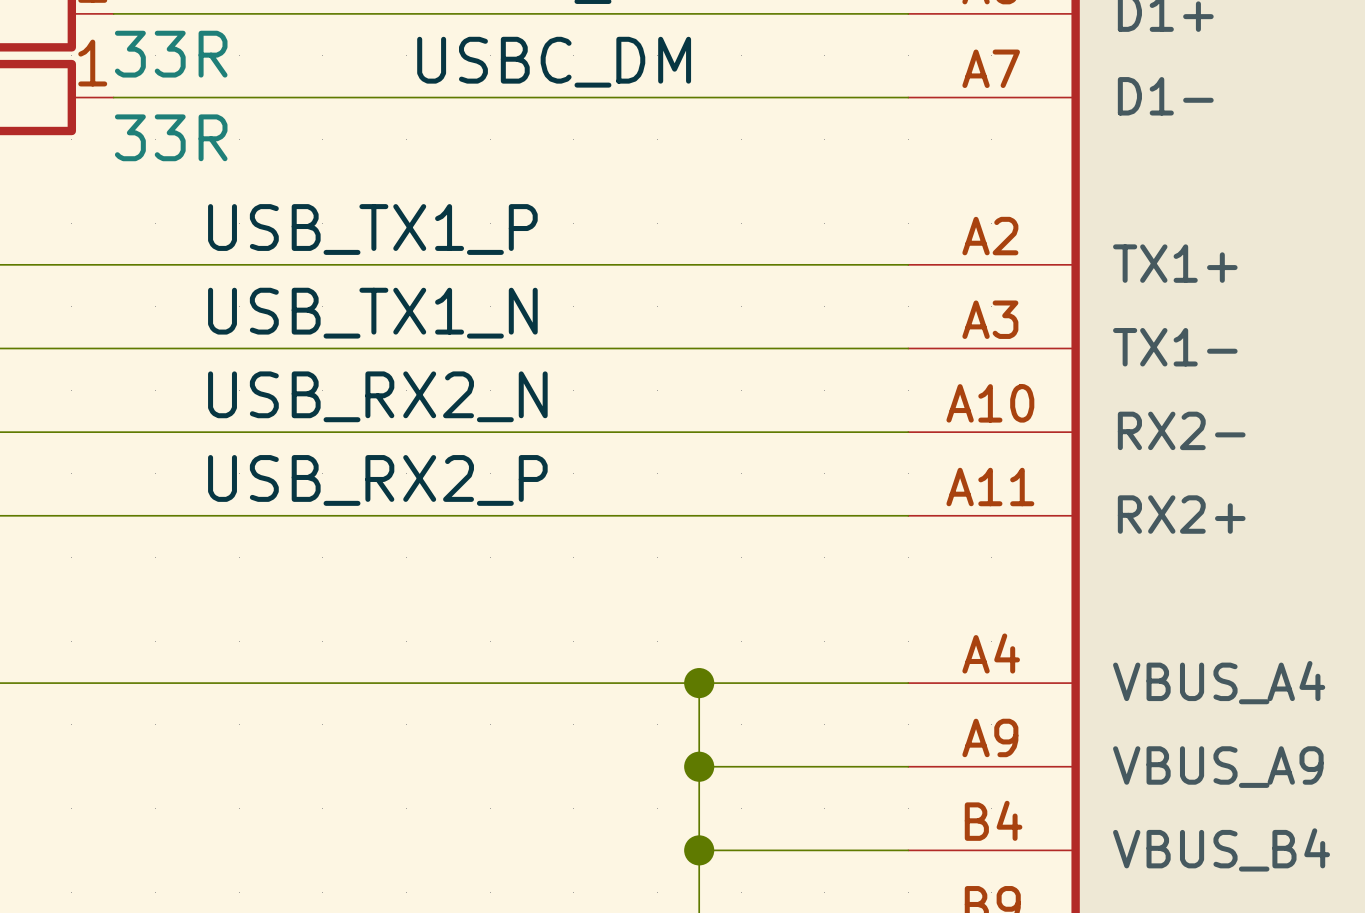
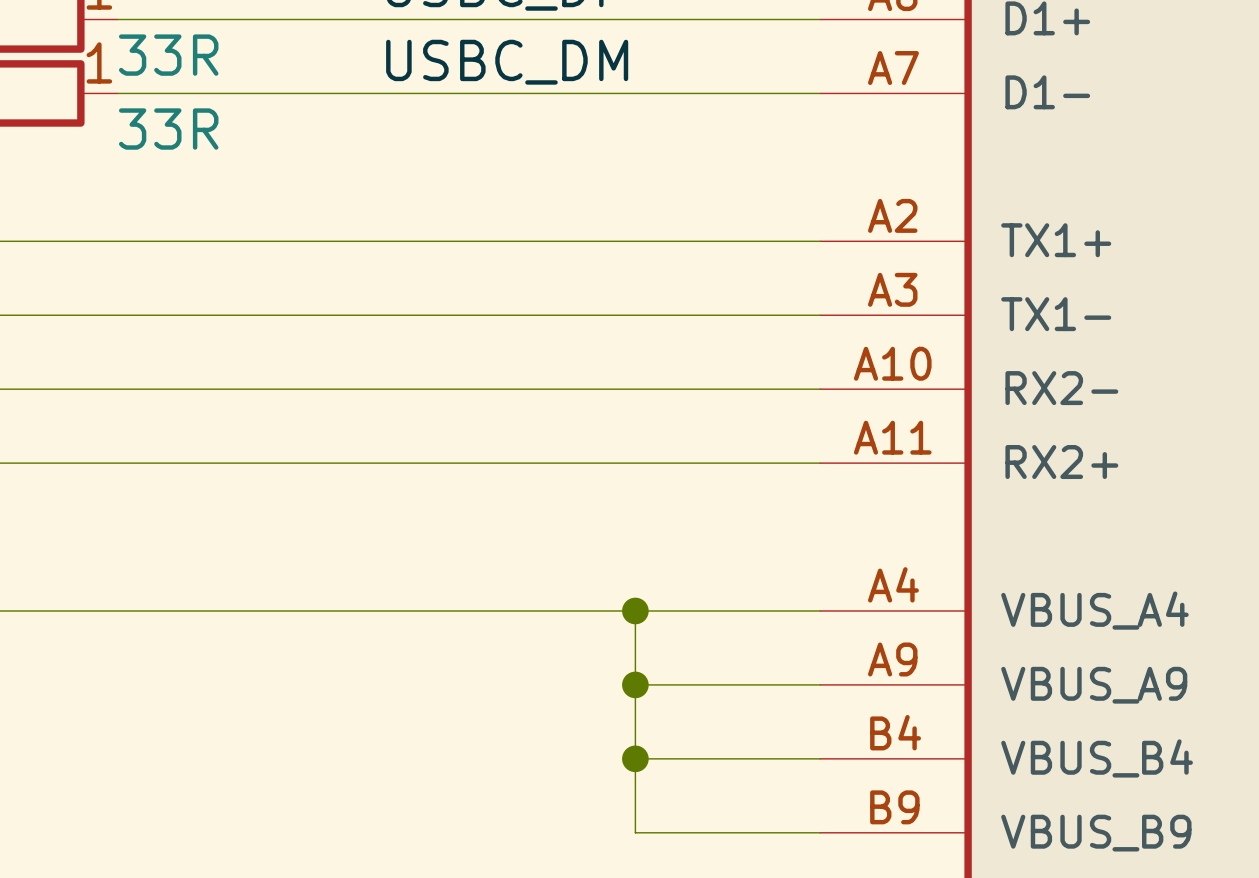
label: USB_TX1_P (372, 229) -> none
label: USB_TX1_N (372, 313) -> none
label: USB_RX2_N (377, 396) -> none
label: USB_RX2_P (377, 480) -> none

